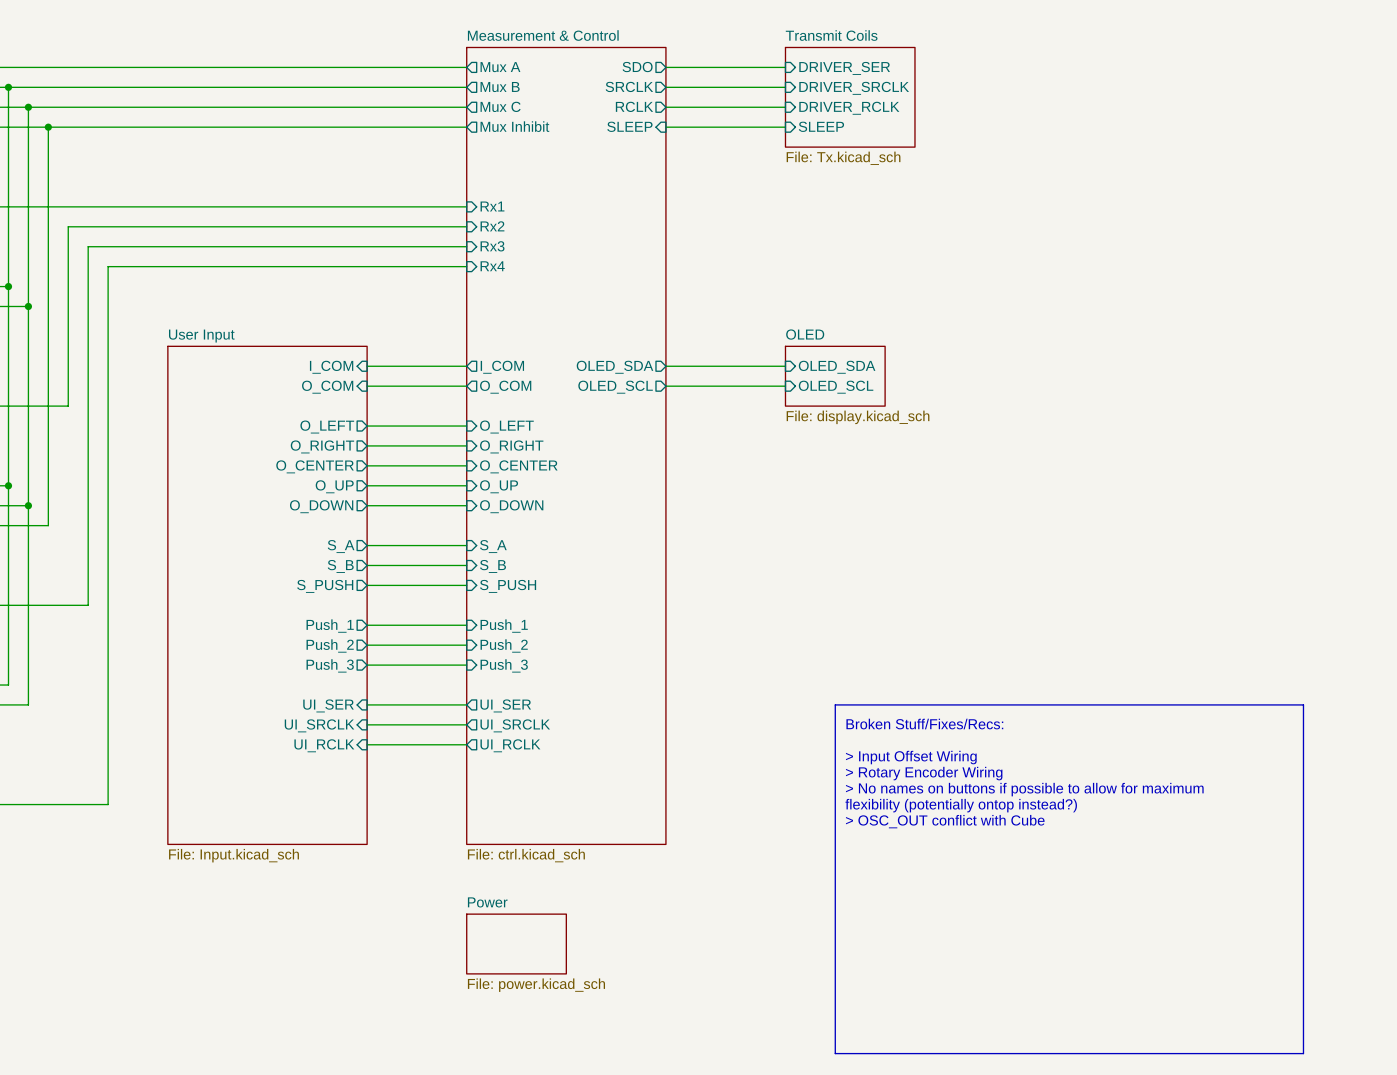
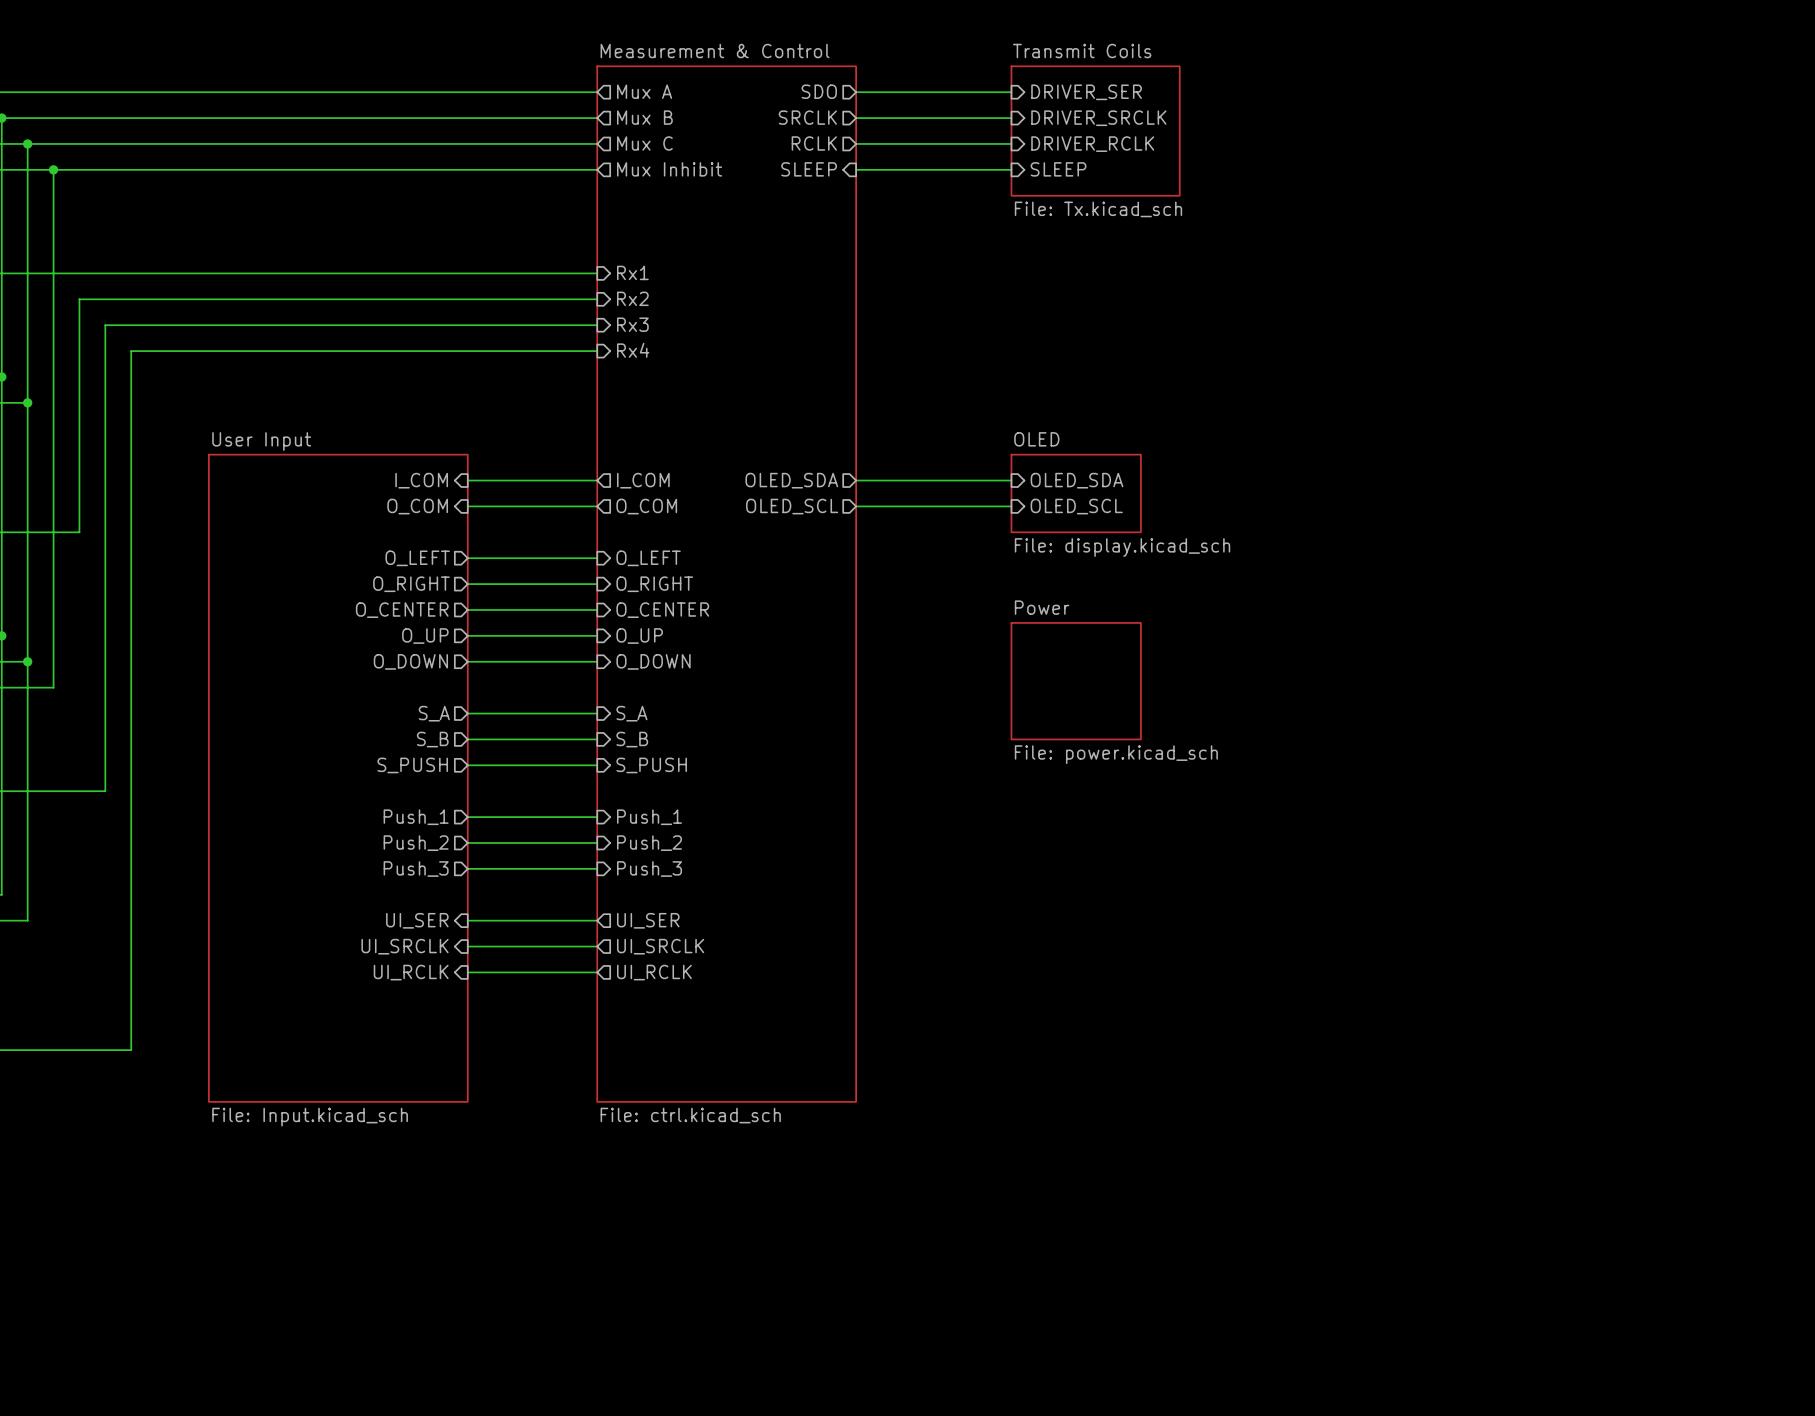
sheet Power: none -> File: power.kicad_sch (1076, 681)
line: (835, 704) (1303, 704) (1303, 1053) (835, 1053) (835, 704) -> none
text: Broken Stuff/Fixes/Recs: (924, 724) -> none
text: > Input Offset Wiring (911, 757) -> none
text: > Rotary Encoder Wiring (924, 773) -> none
text: > No names on buttons if possible to allow for maximum (1024, 789) -> none
text: flexibility (potentially ontop instead?) (961, 805) -> none
text: > OSC_OUT conflict with Cube (945, 821) -> none
sheet Power: File: power.kicad_sch (516, 944) -> none

